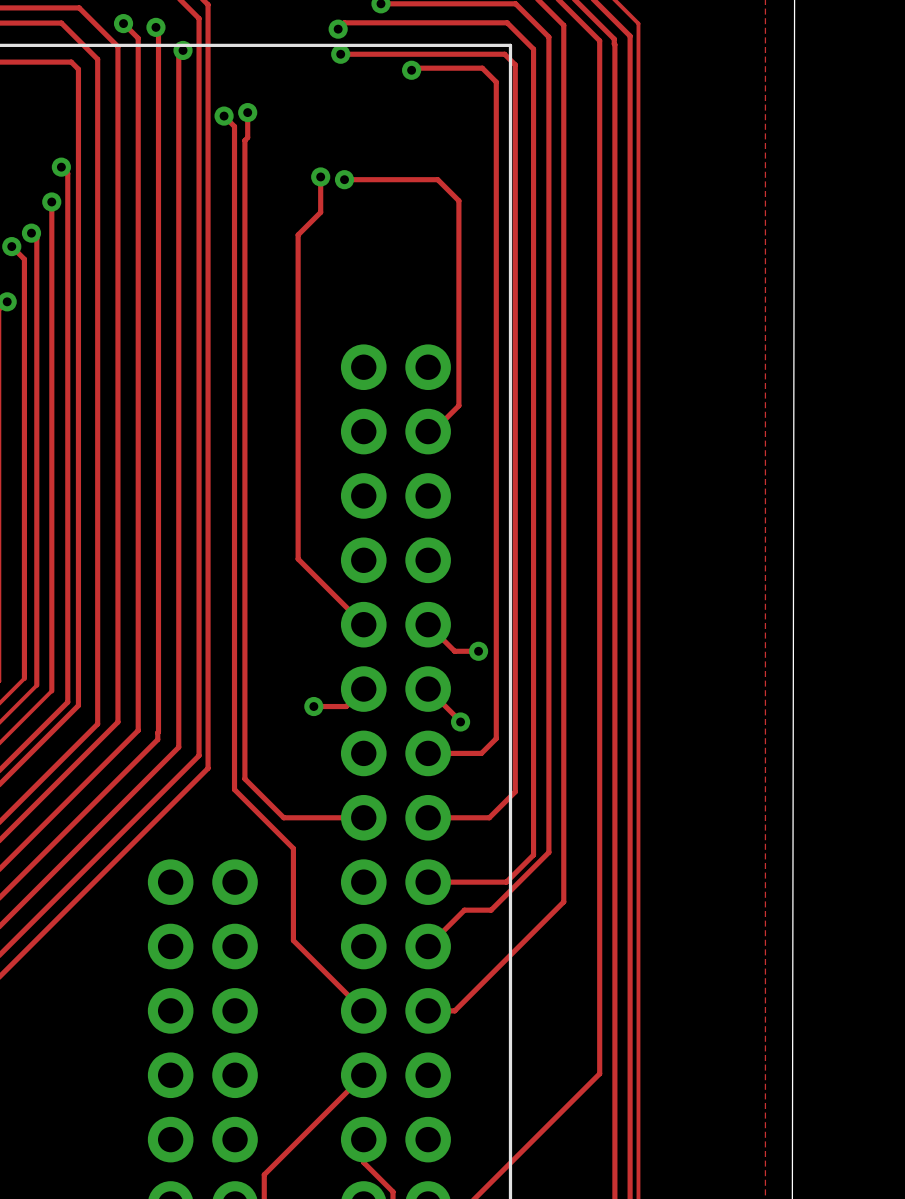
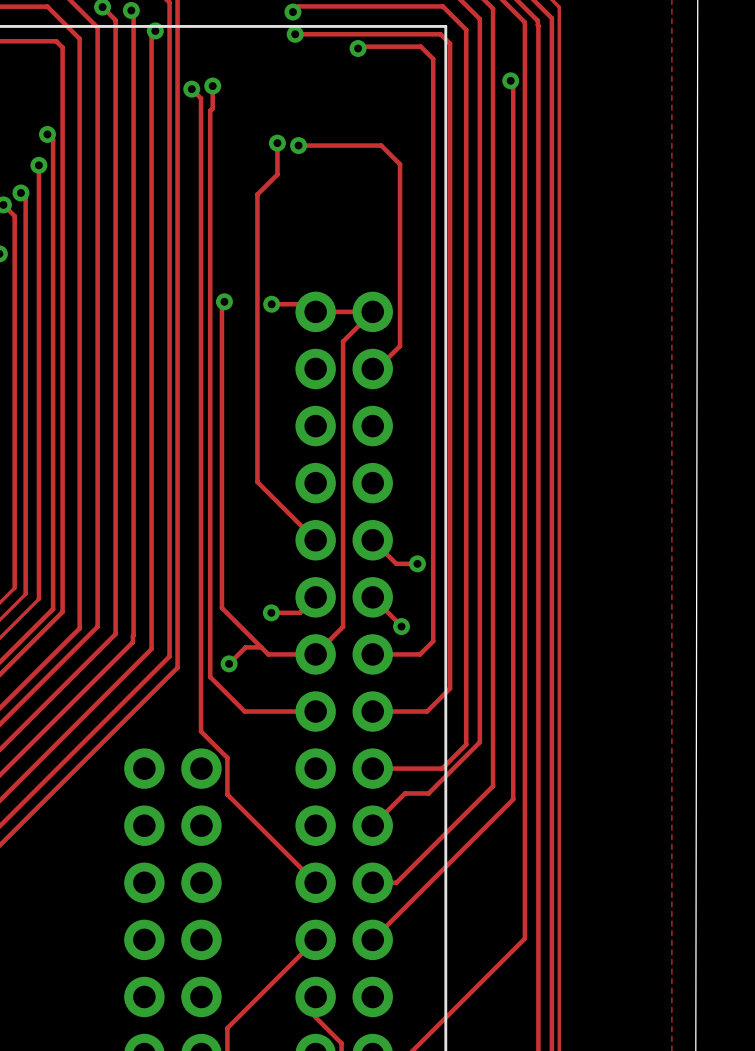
track: none -> (510, 80) (513, 83) (513, 799) (372, 939)
via: none -> (510, 80)
track: none -> (224, 301) (221, 304) (221, 608) (268, 654) (315, 654)
via: none -> (224, 301)
track: none -> (271, 304) (308, 304) (315, 311) (372, 311) (343, 341) (343, 626) (315, 654)
via: none -> (271, 304)
track: none -> (261, 647) (245, 647) (229, 663)
via: none -> (229, 663)
track: (234, 789) (293, 848) (293, 940) -> (201, 686) (201, 731) (227, 757) (227, 794) (253, 820)

